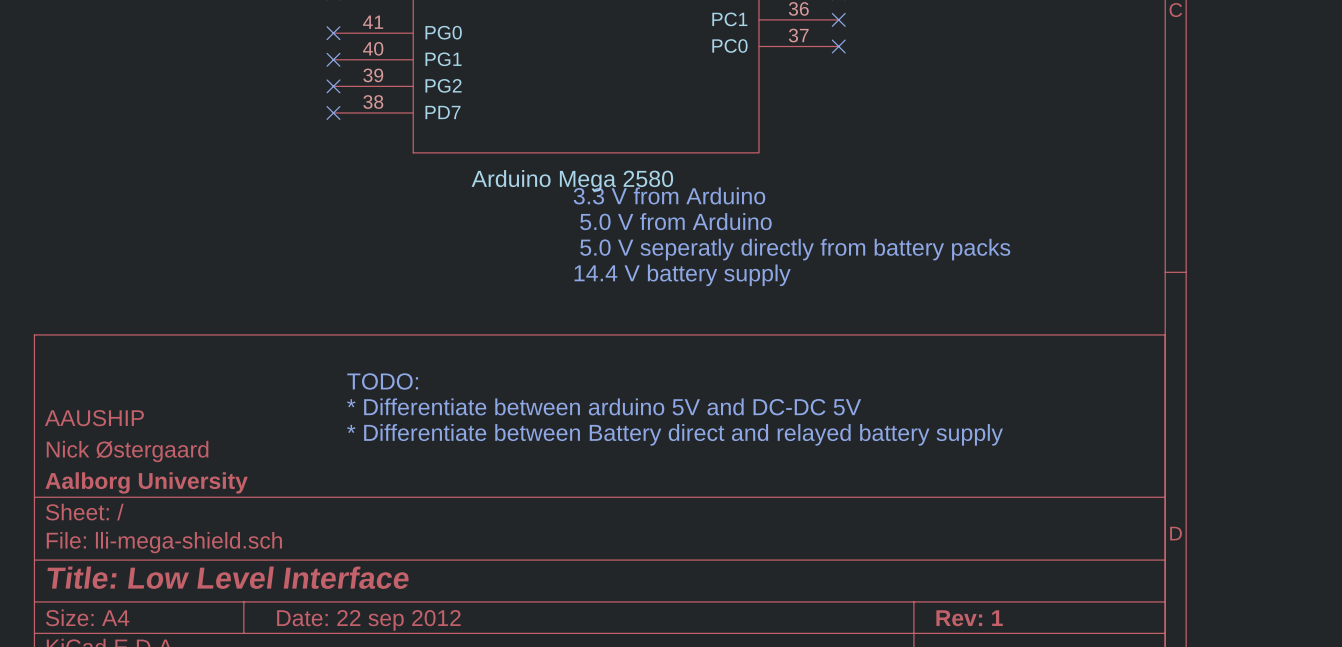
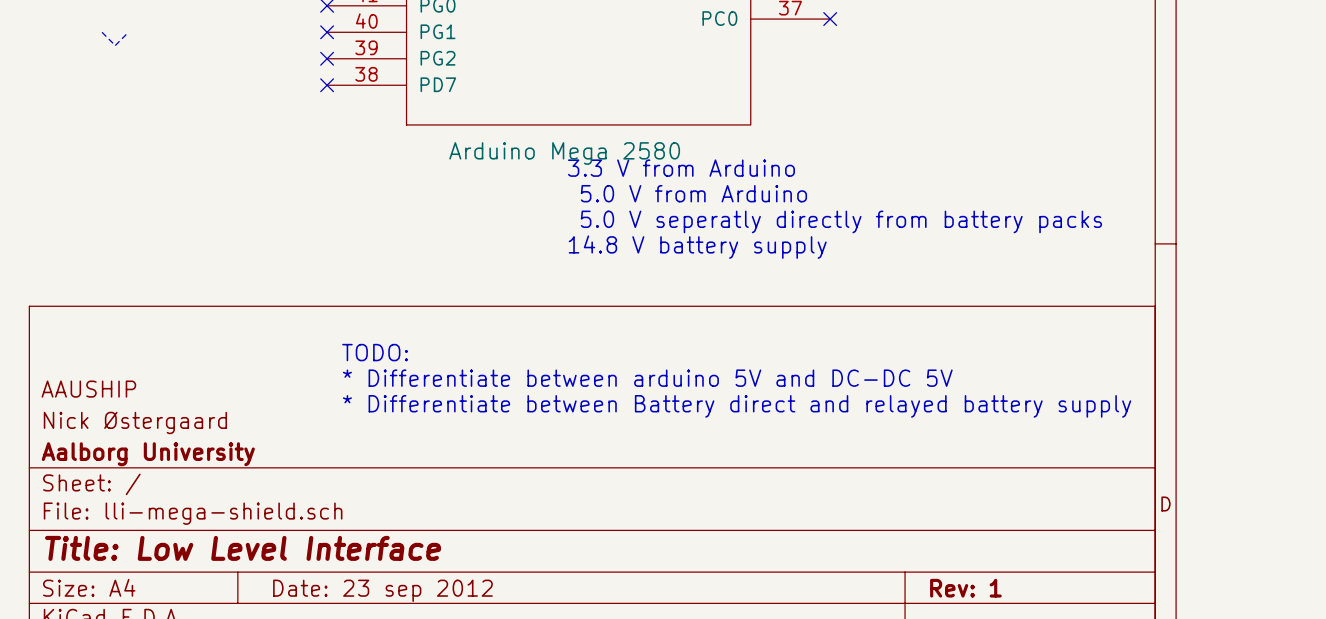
line: none -> (102, 32) (115, 45) (128, 32)
text: 14.4 V battery supply (682, 275) -> 14.8 V battery supply (697, 247)
title block: Date: 22 sep 2012 (368, 620) -> Date: 23 sep 2012 (382, 590)

